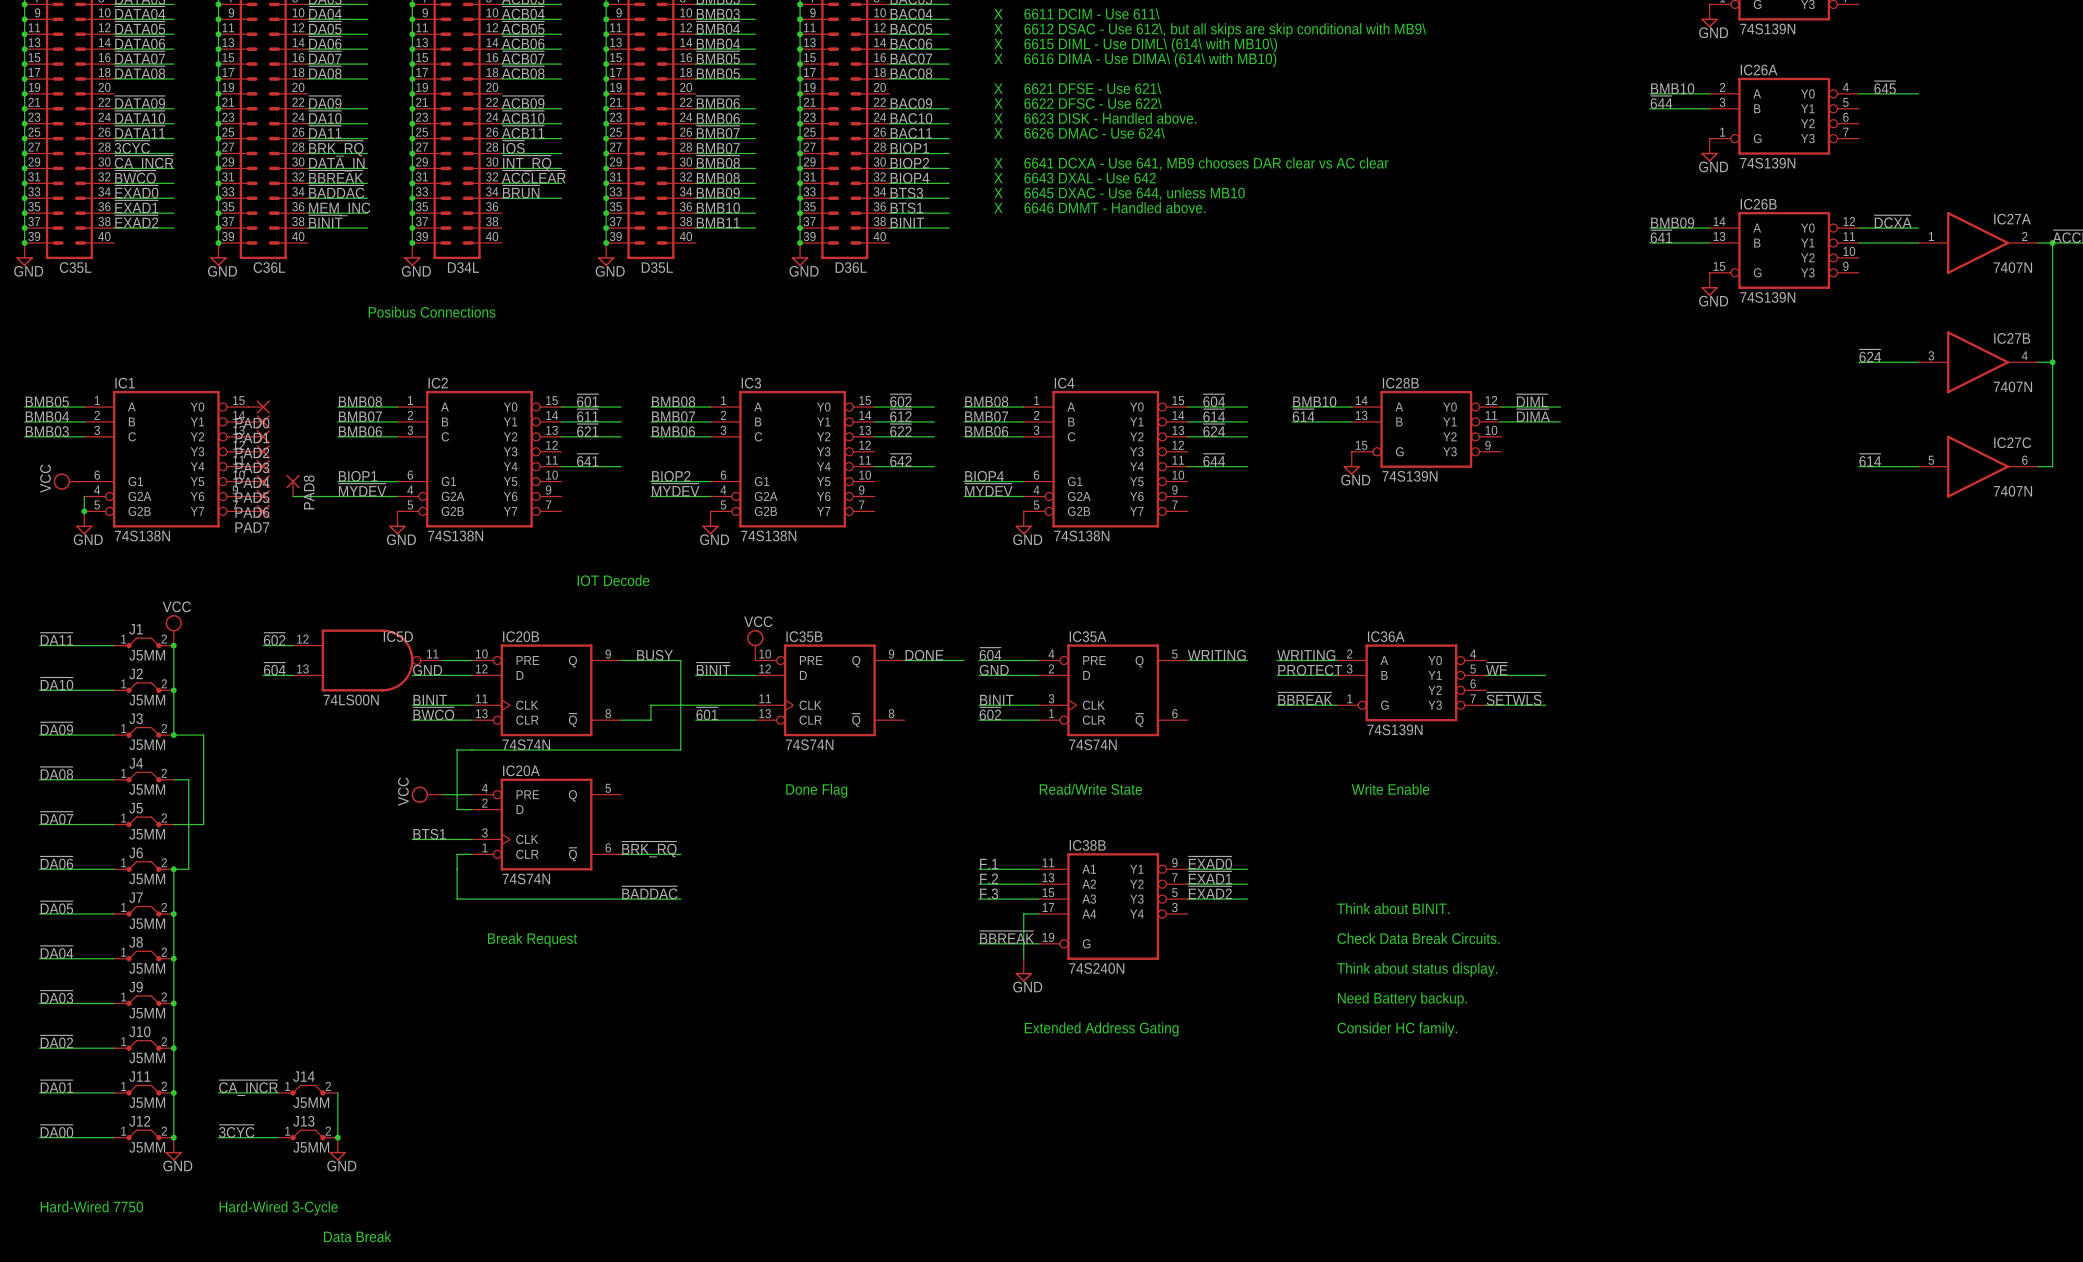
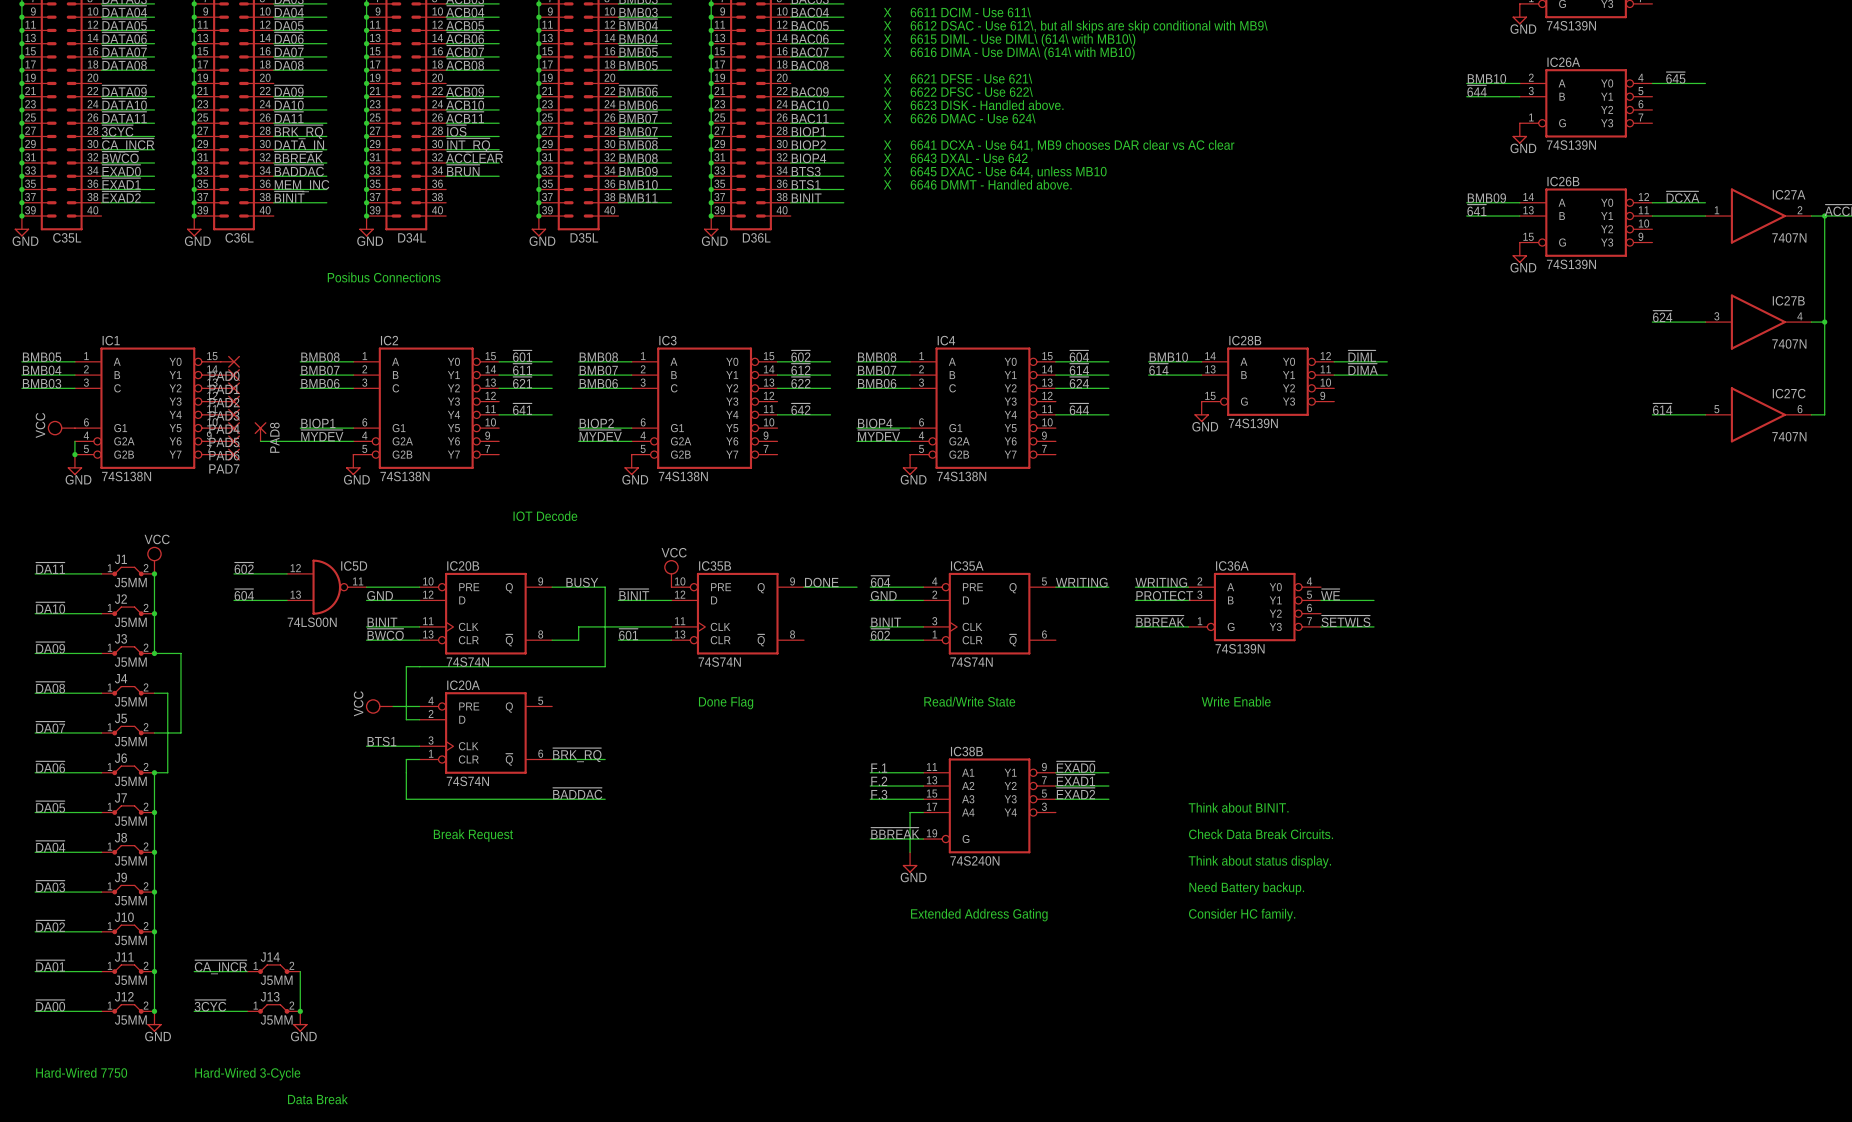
IC5D symbol: [293, 629, 443, 692] -> [287, 559, 367, 615]

